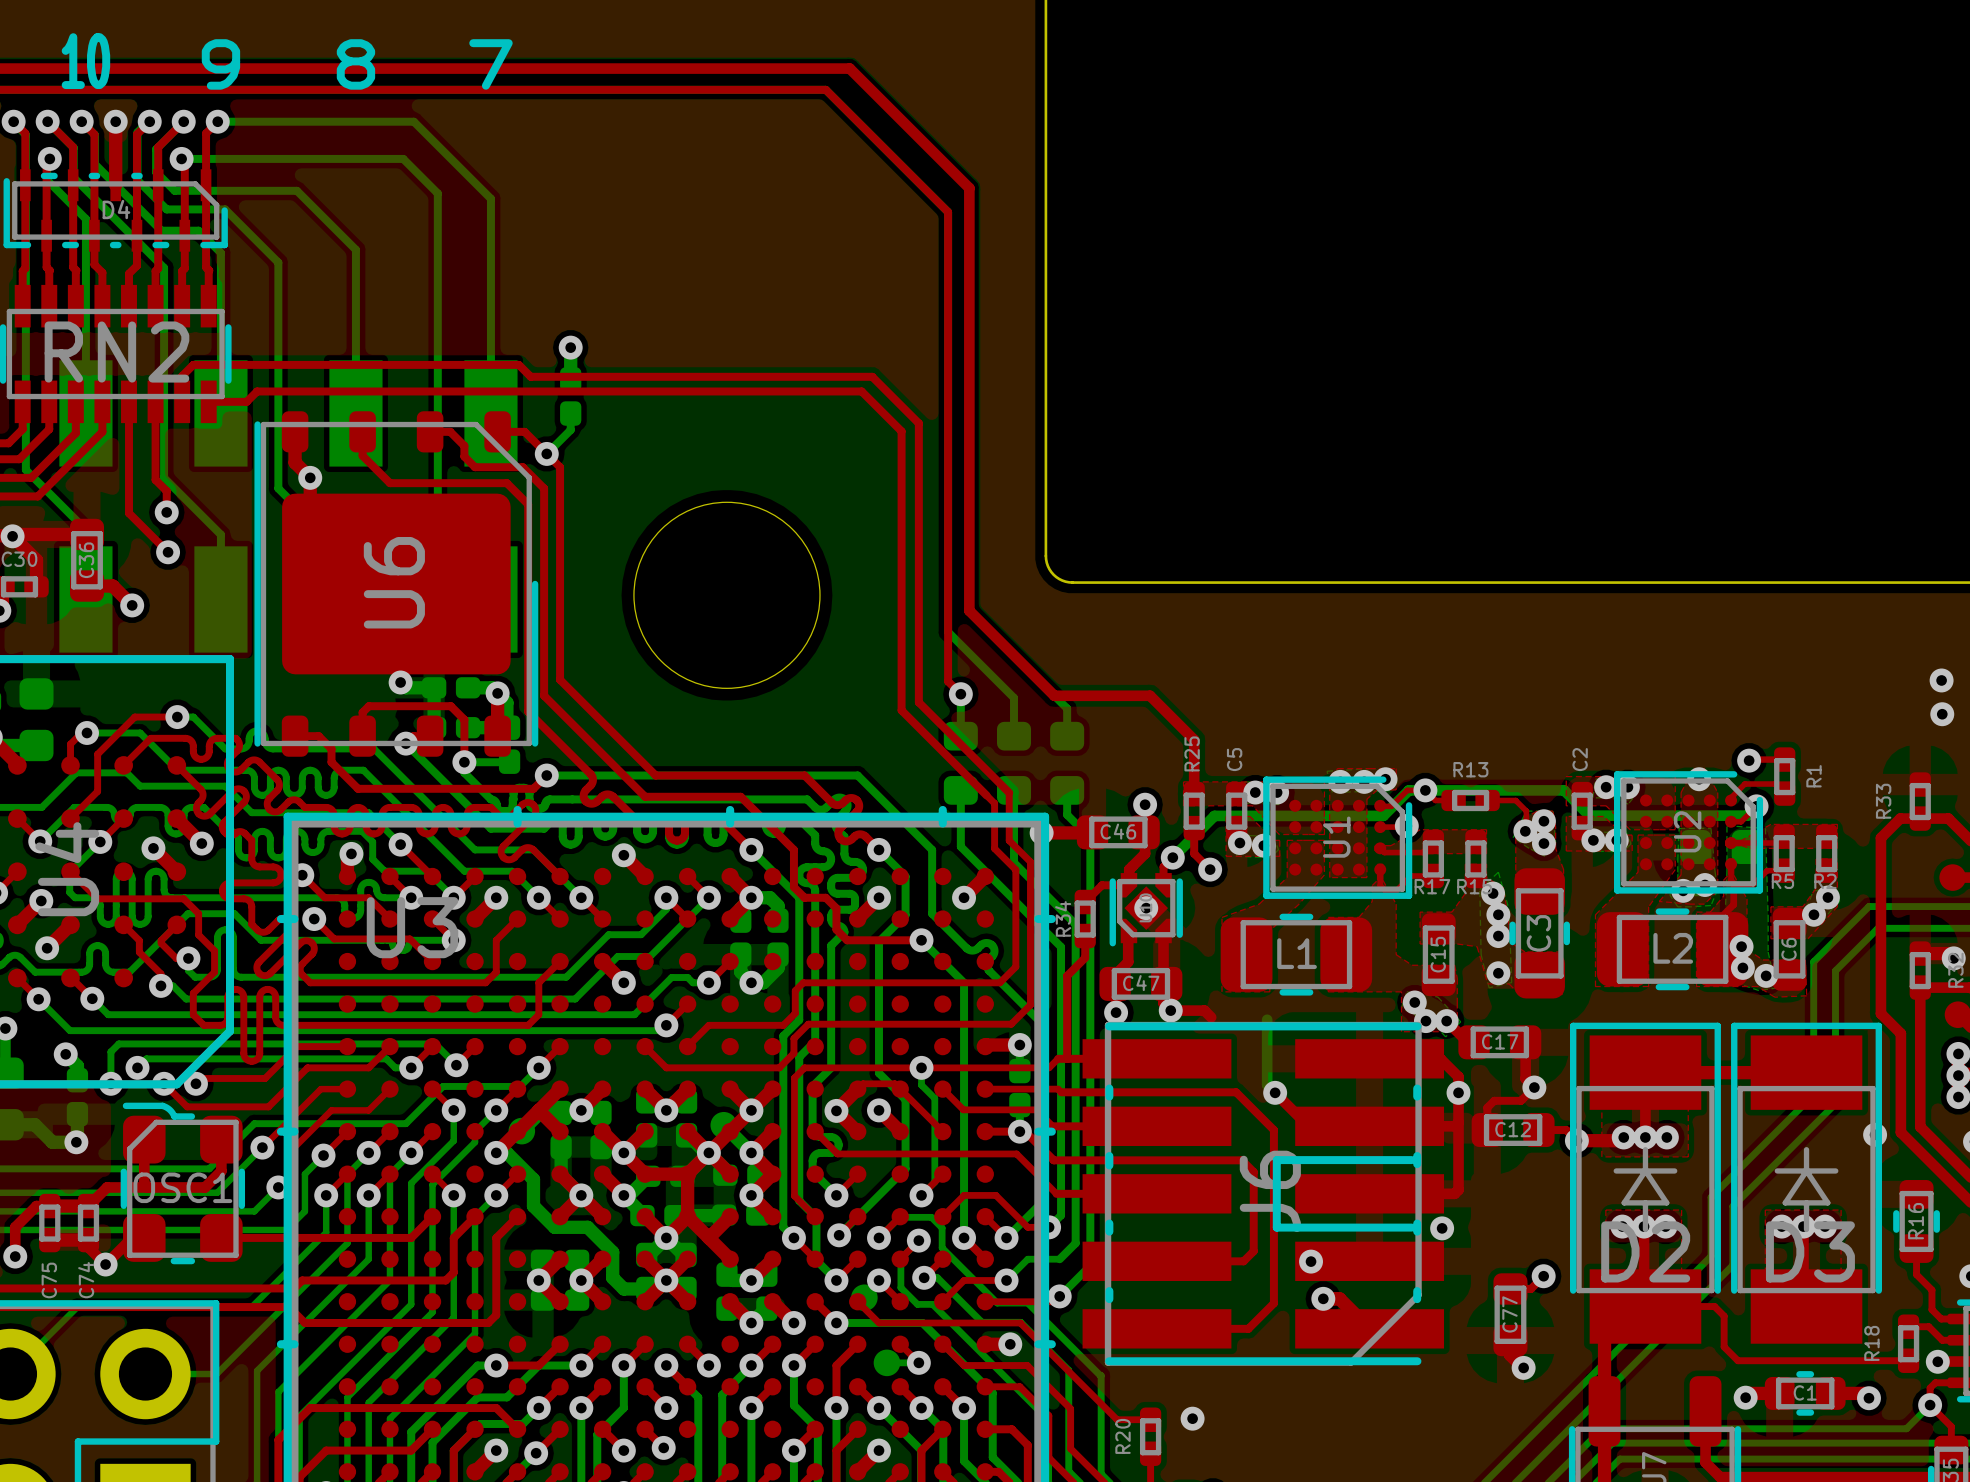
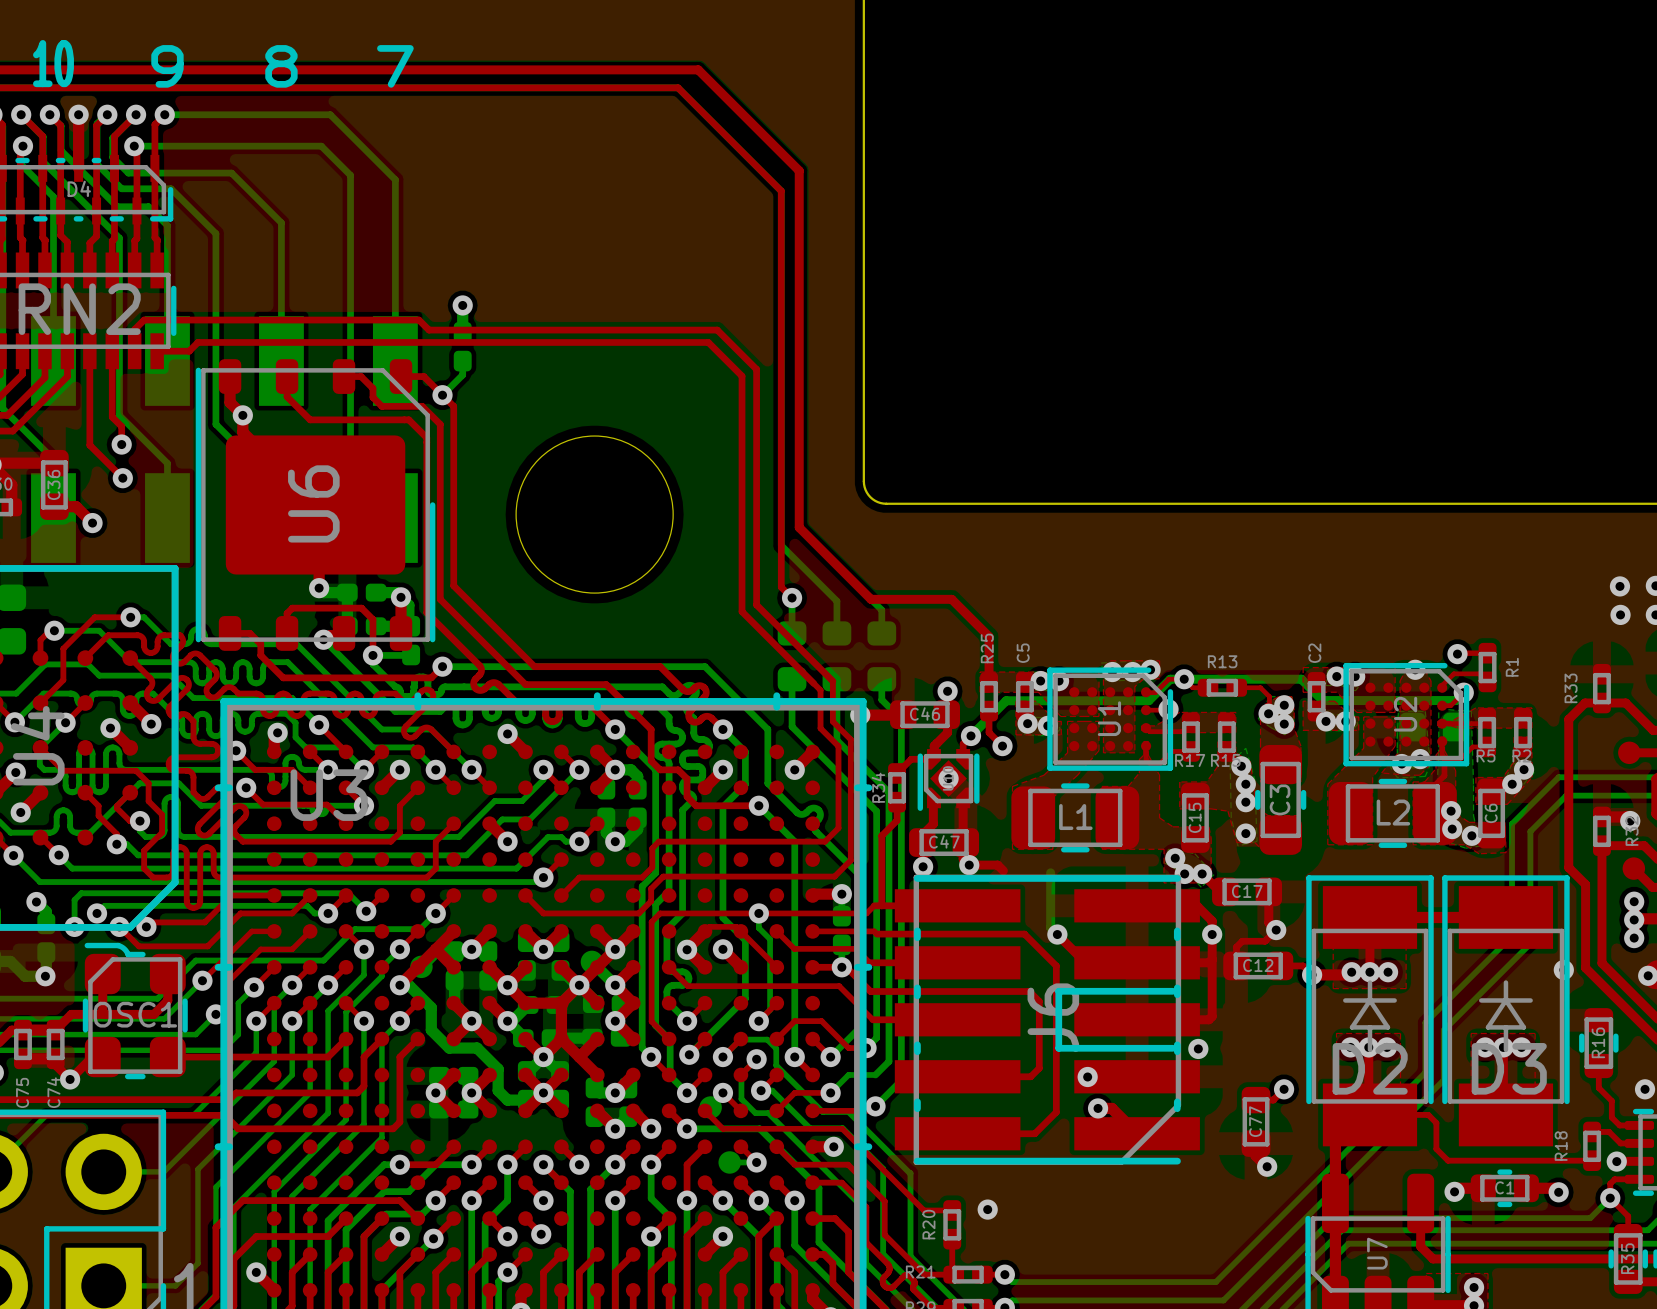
U6 footprint: [254, 411, 539, 757] -> [195, 359, 436, 651]

